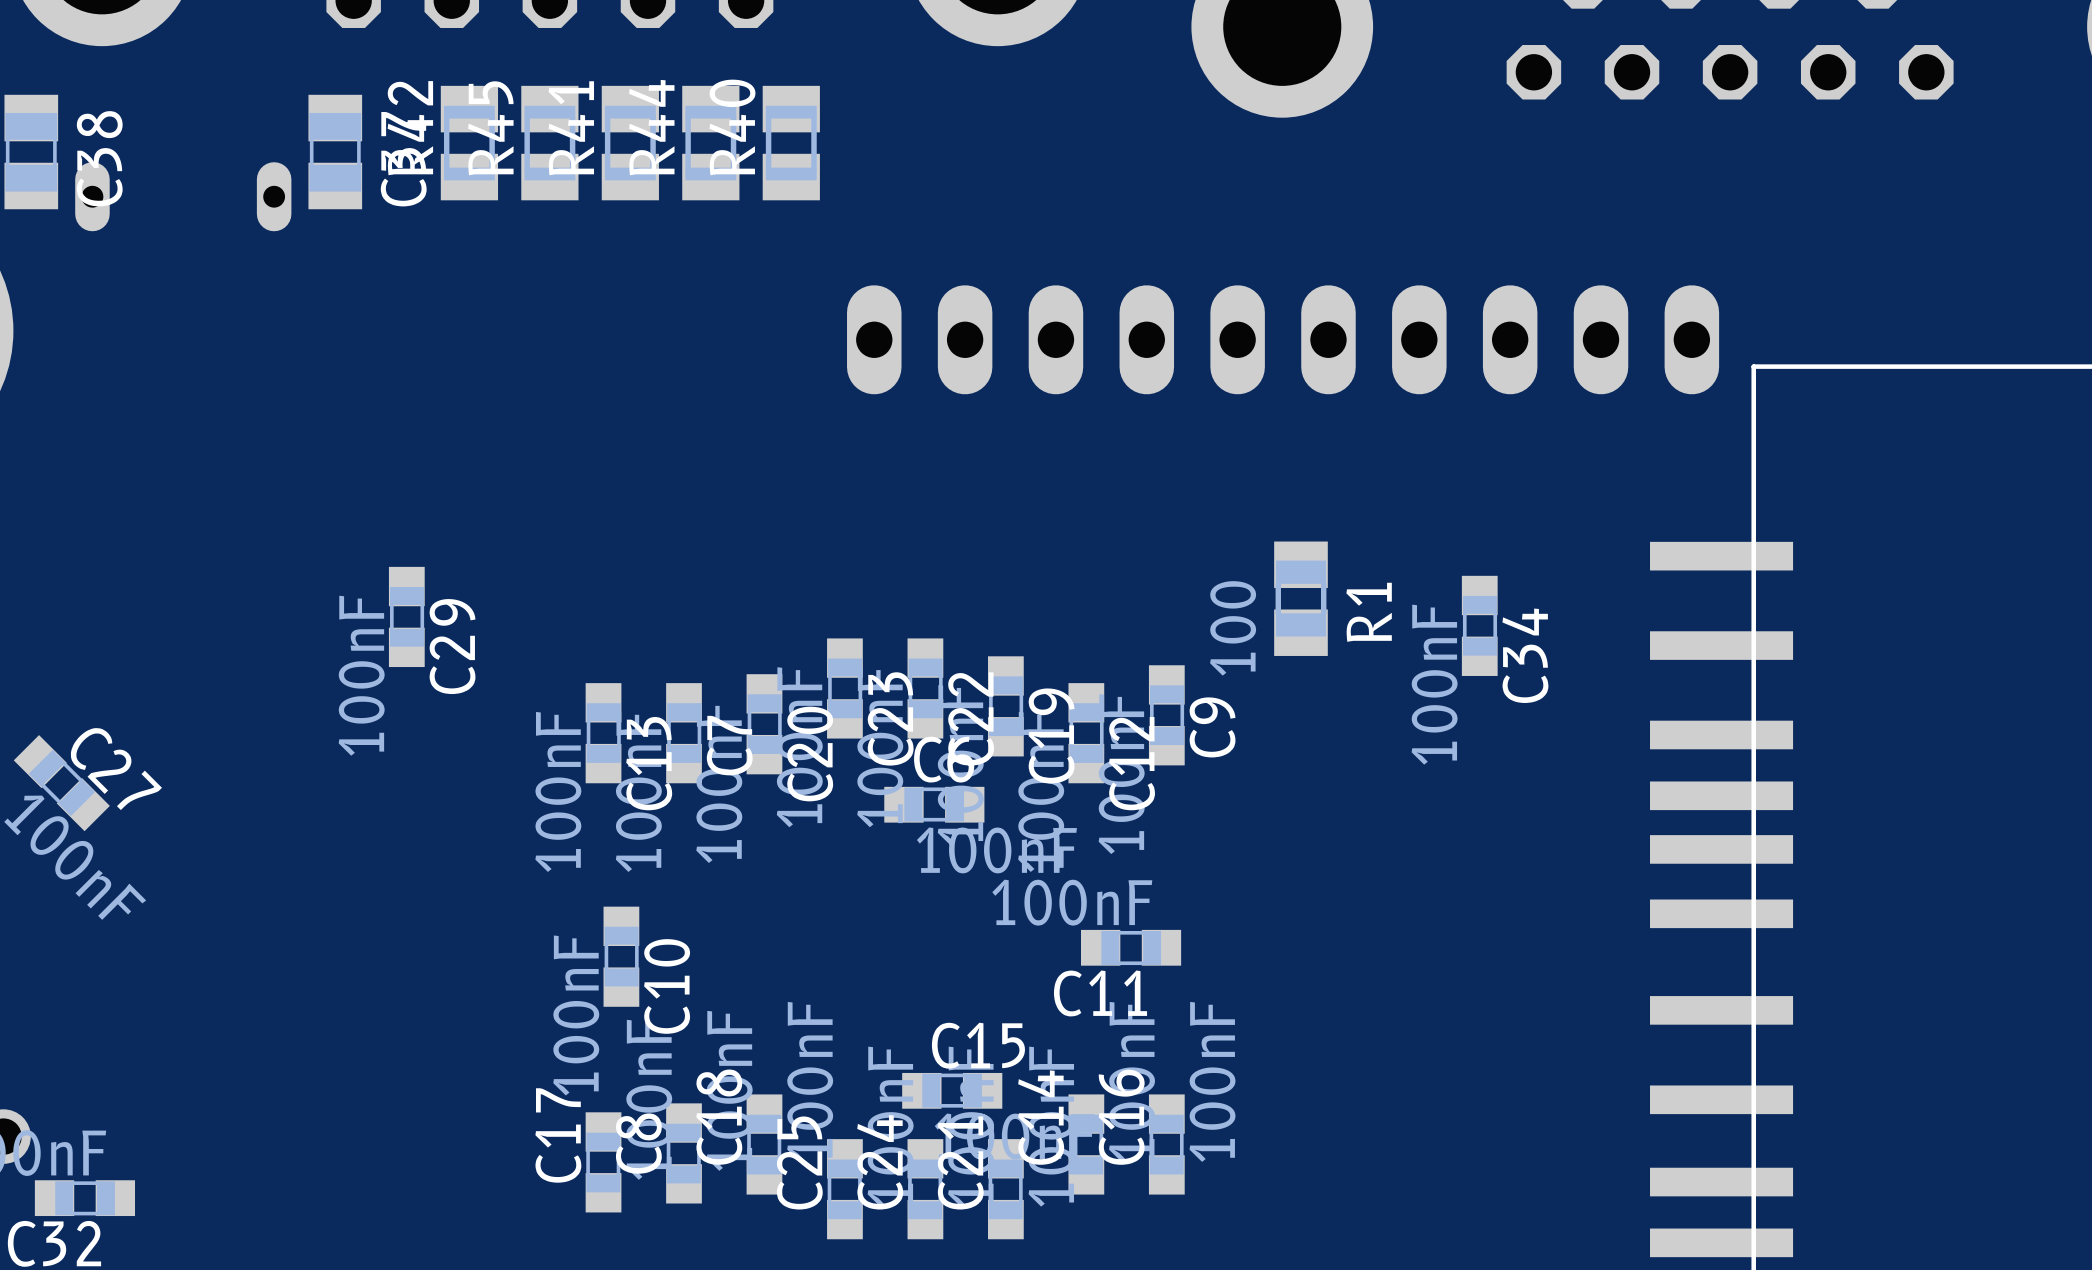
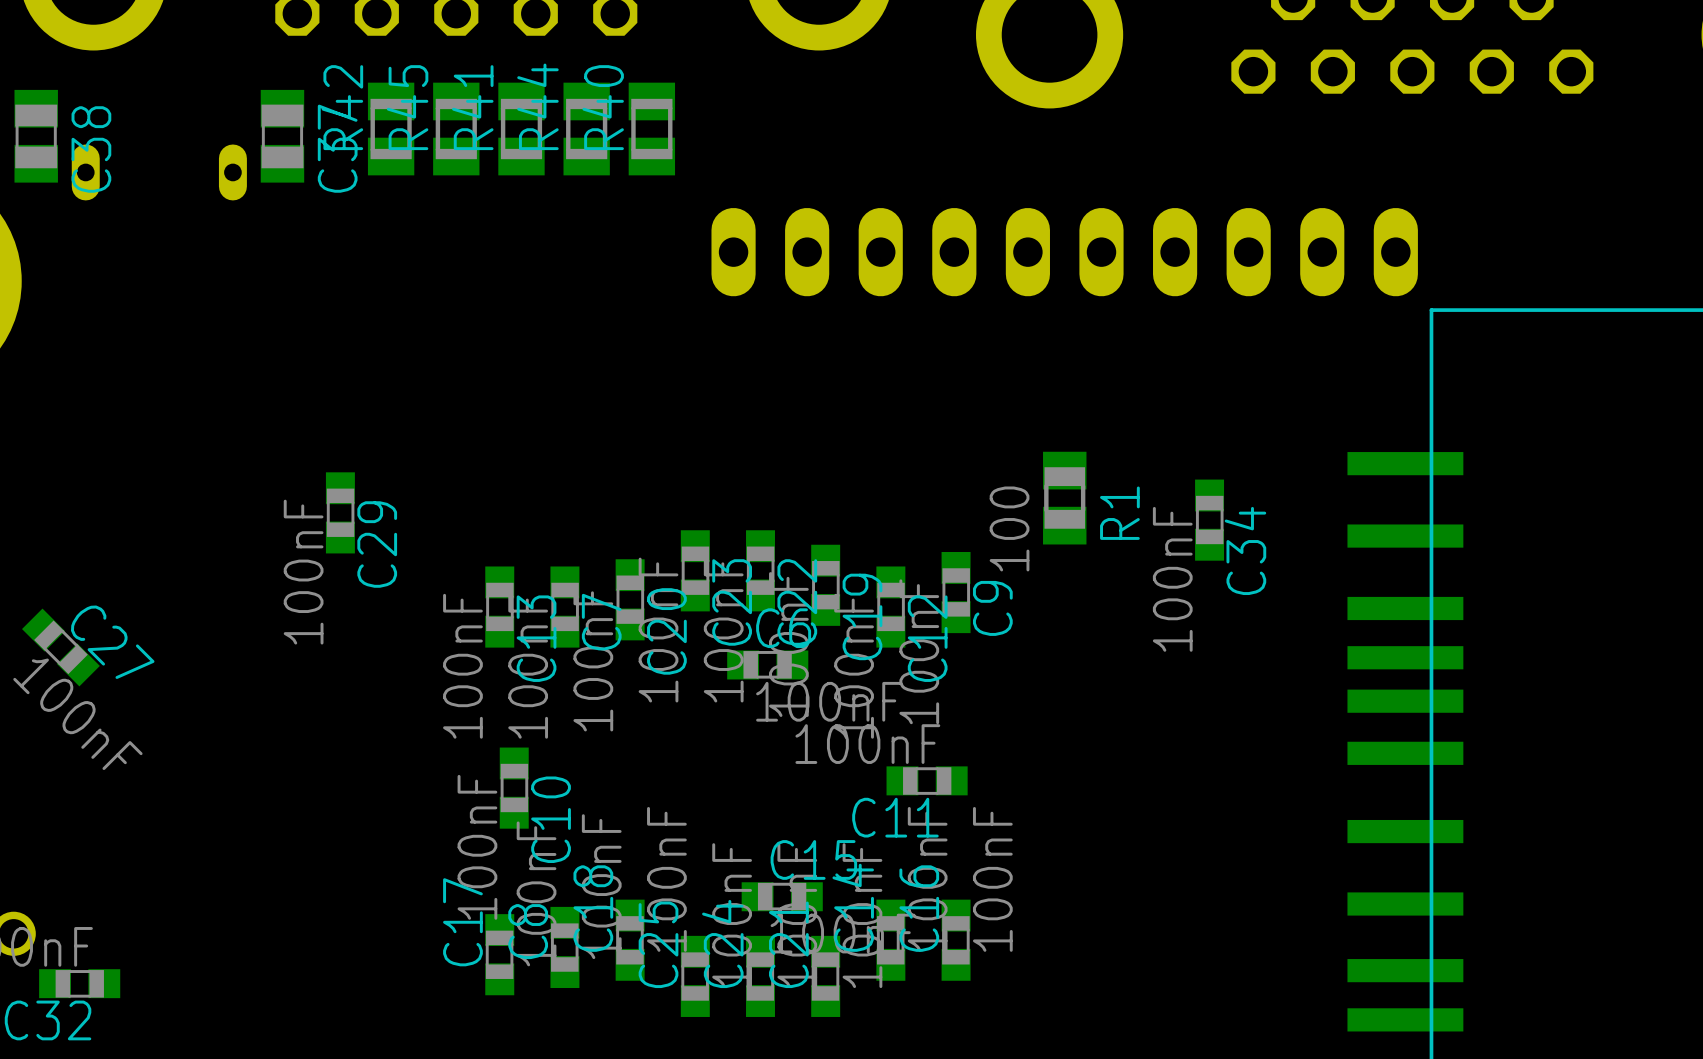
part position: (1283, 339) -> (1064, 252)

